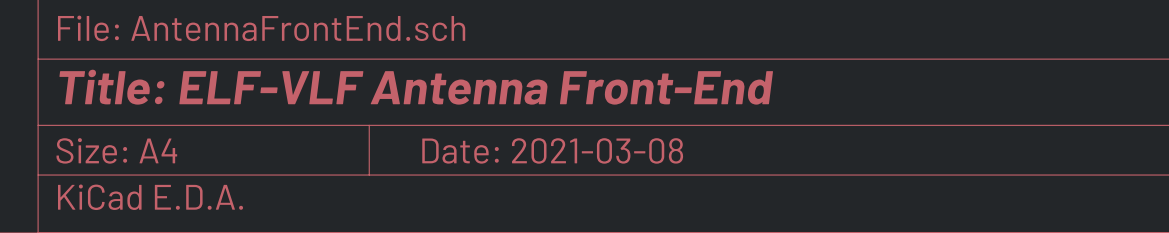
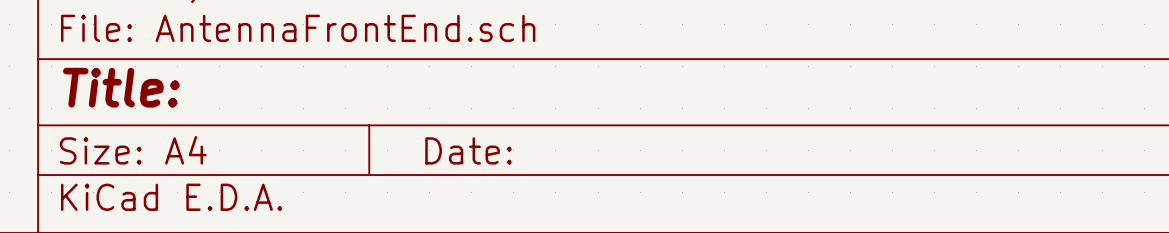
title block: Title: ELF-VLF Antenna Front-End (416, 87) -> Title: (121, 87)
title block: Date: 2021-03-08 (552, 150) -> Date: (468, 150)

